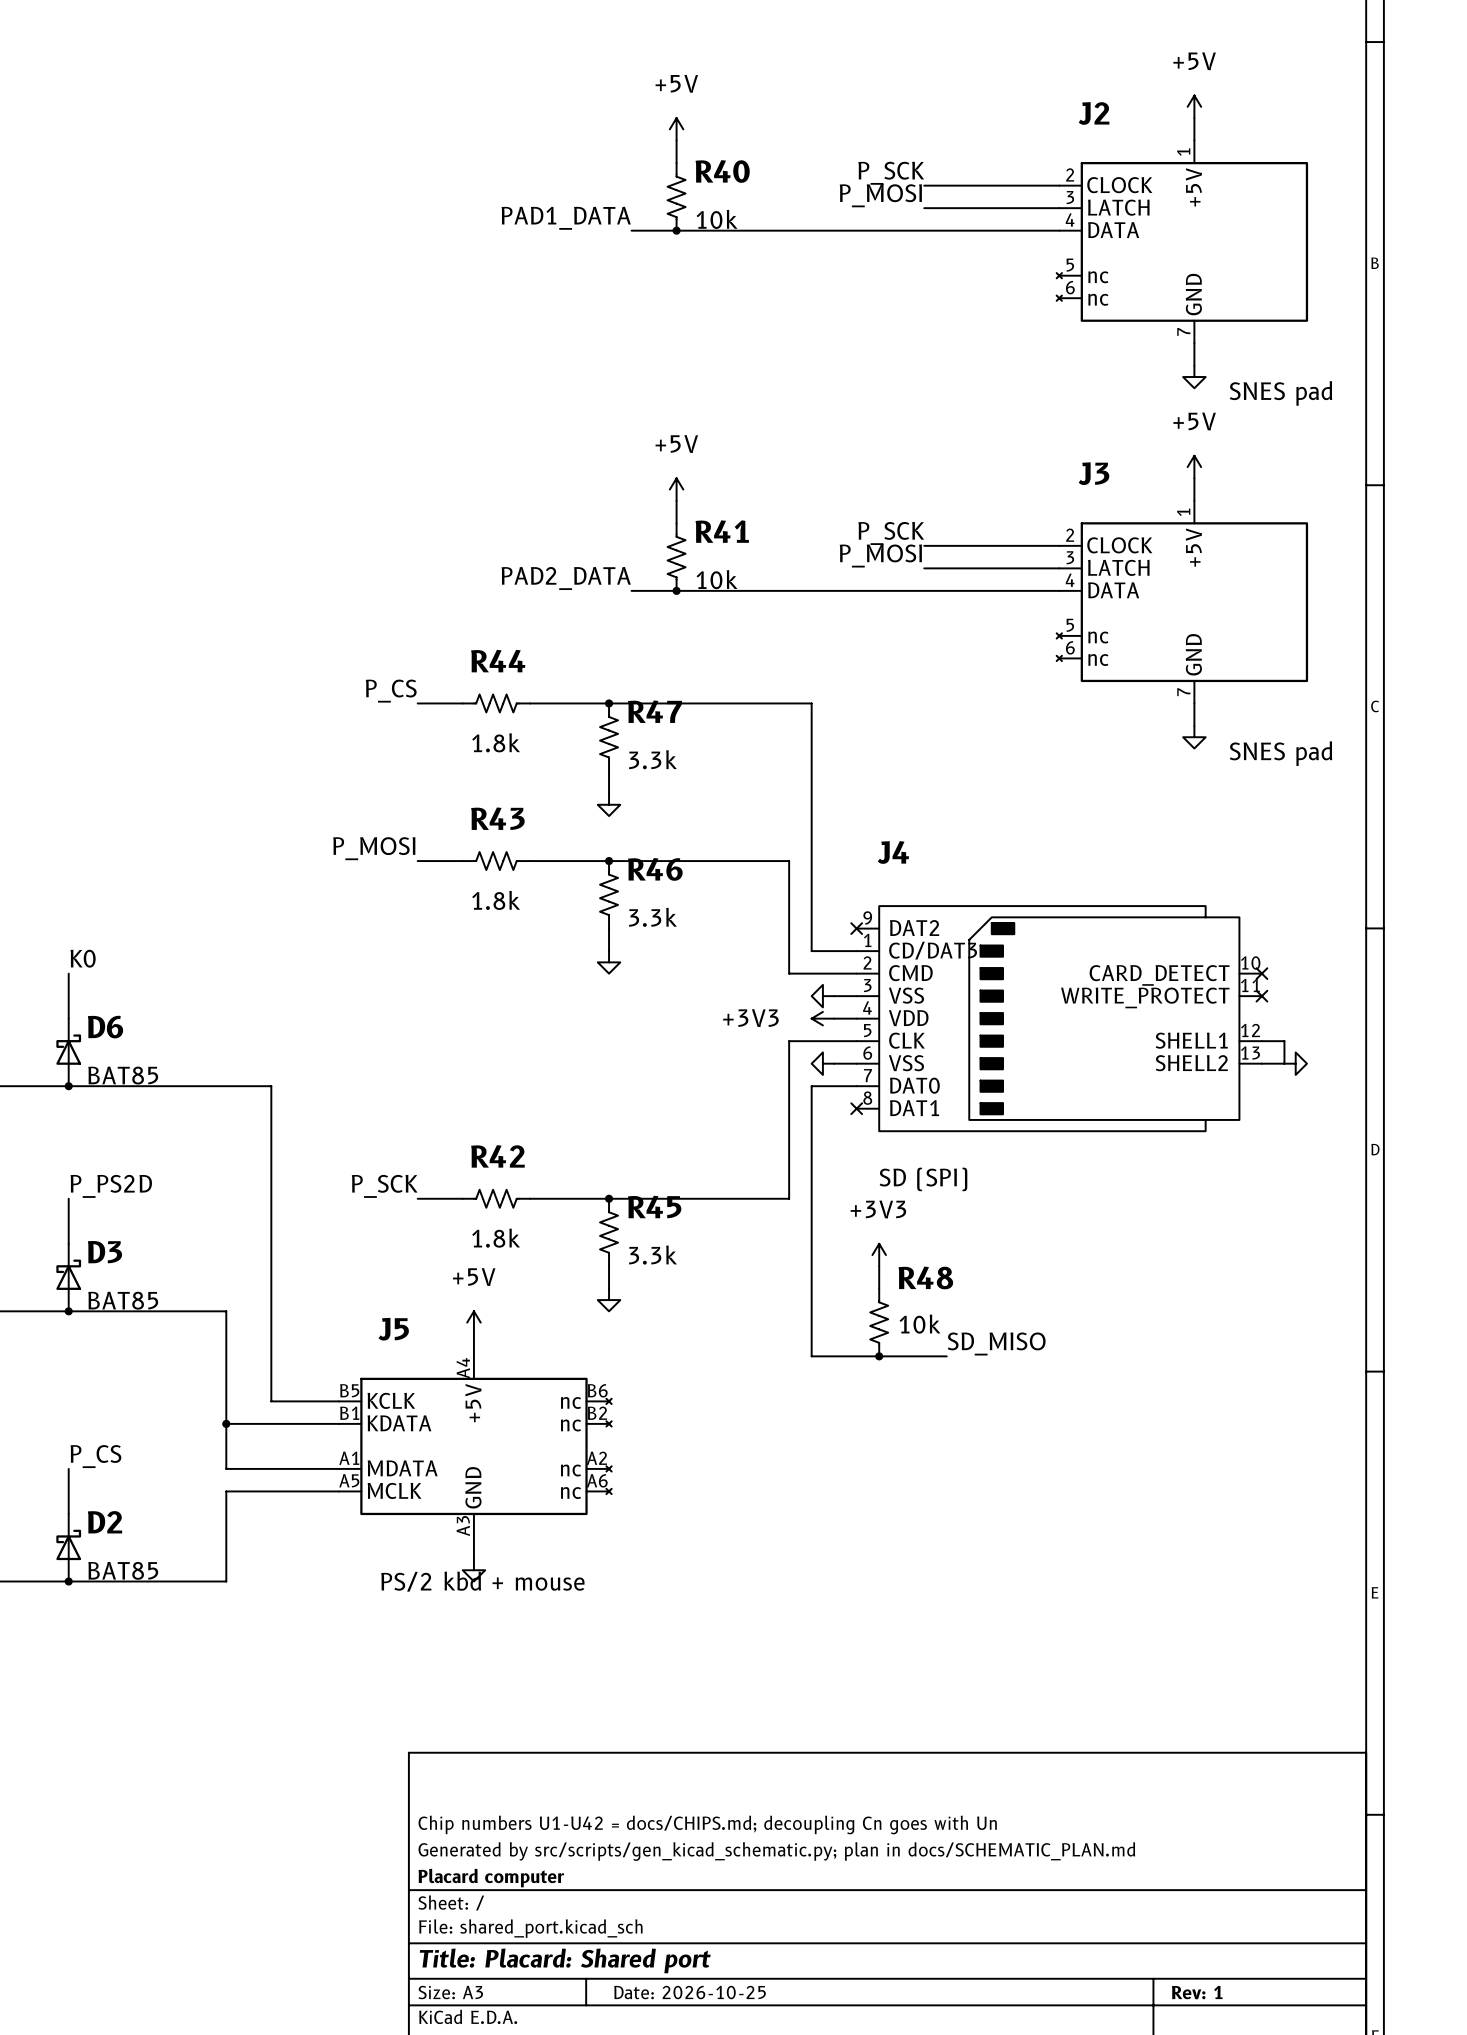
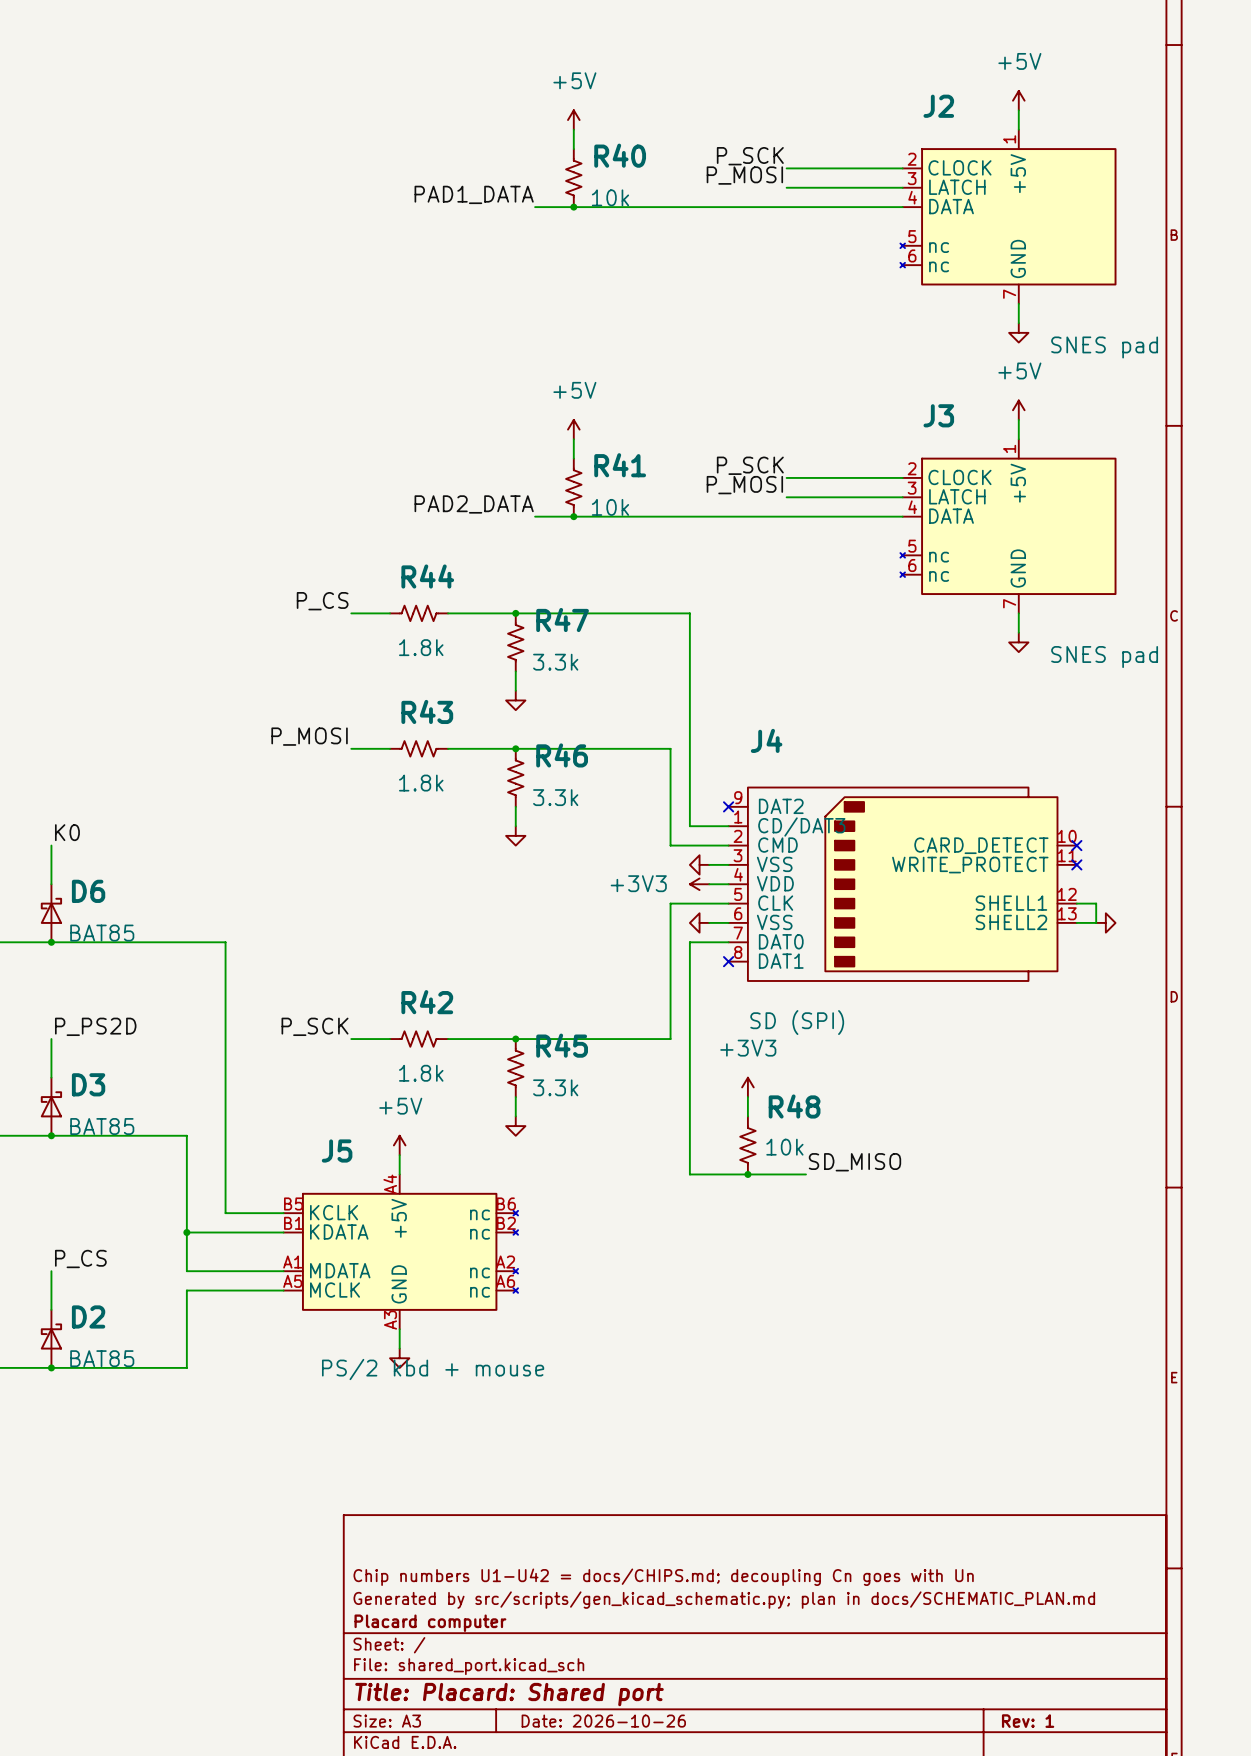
title block: Date: 2026-10-25 (690, 1992) -> Date: 2026-10-26 (603, 1721)

